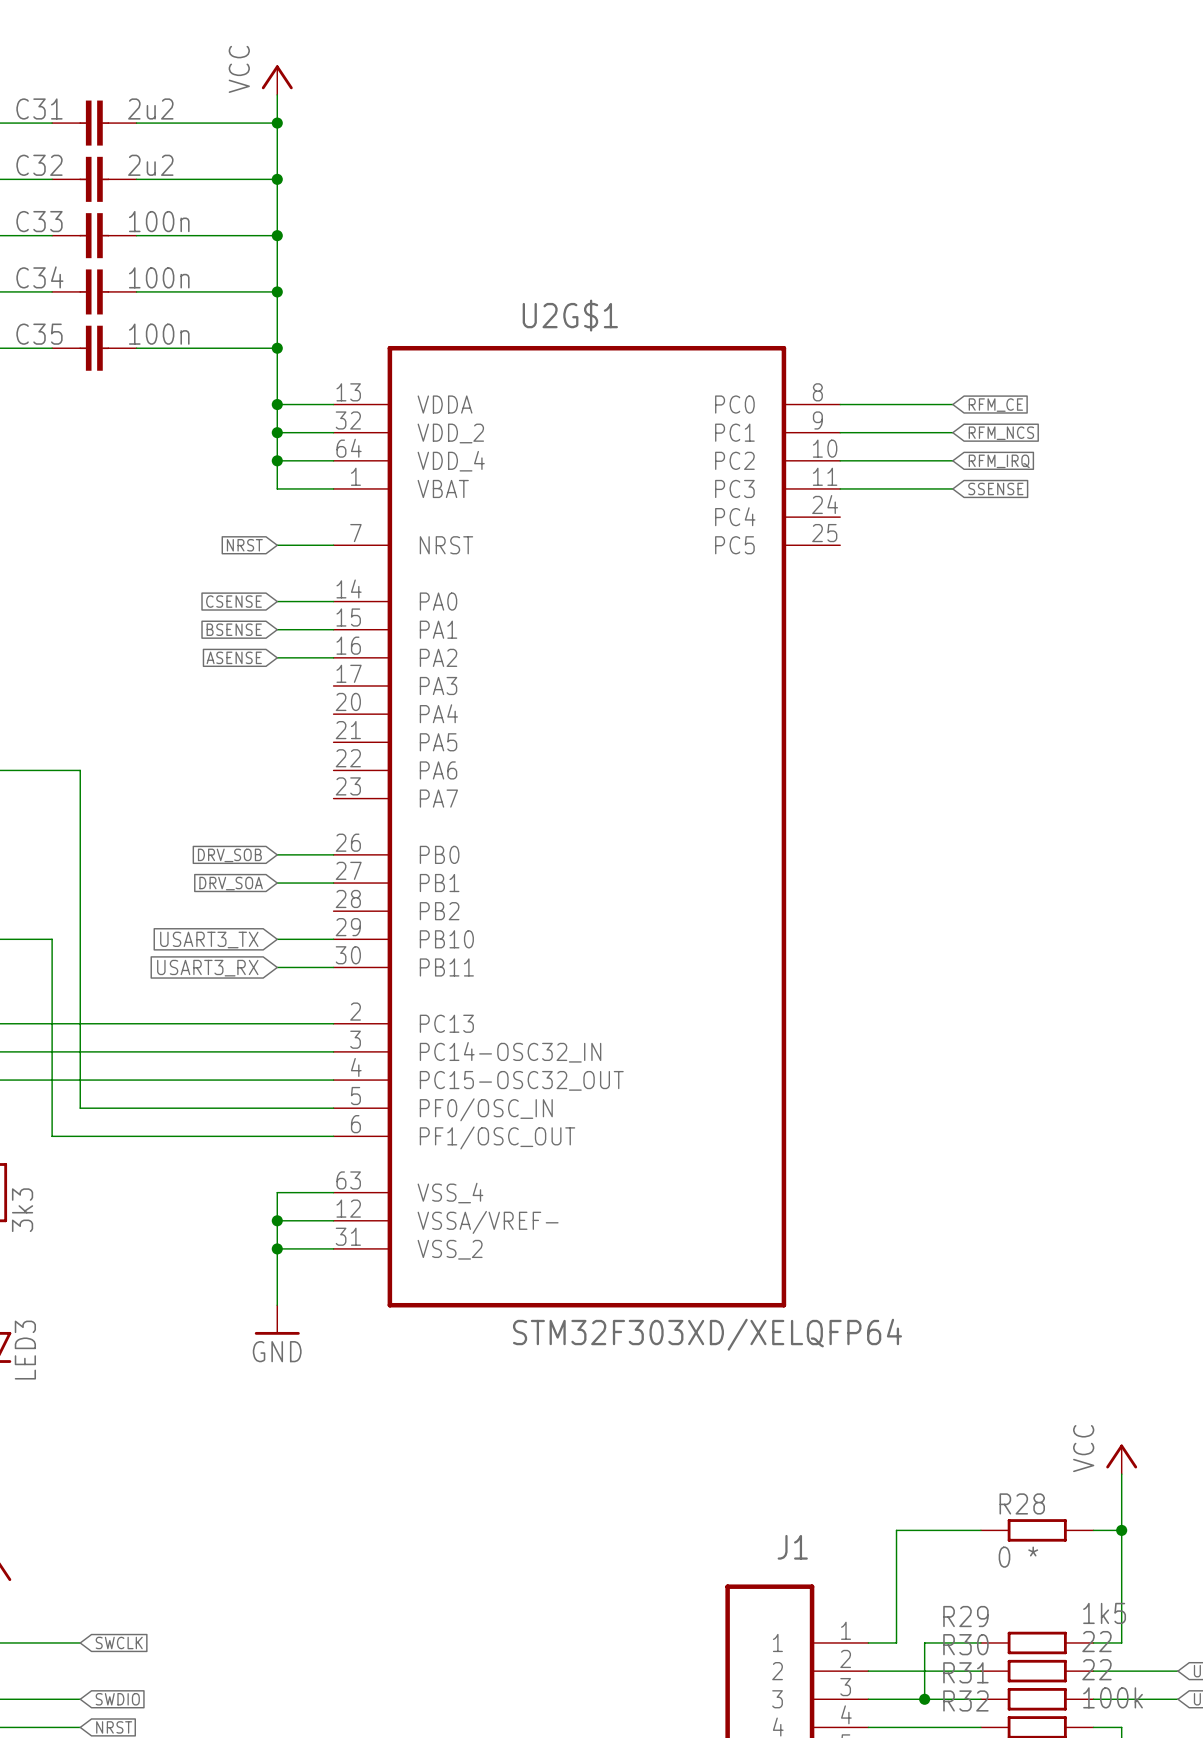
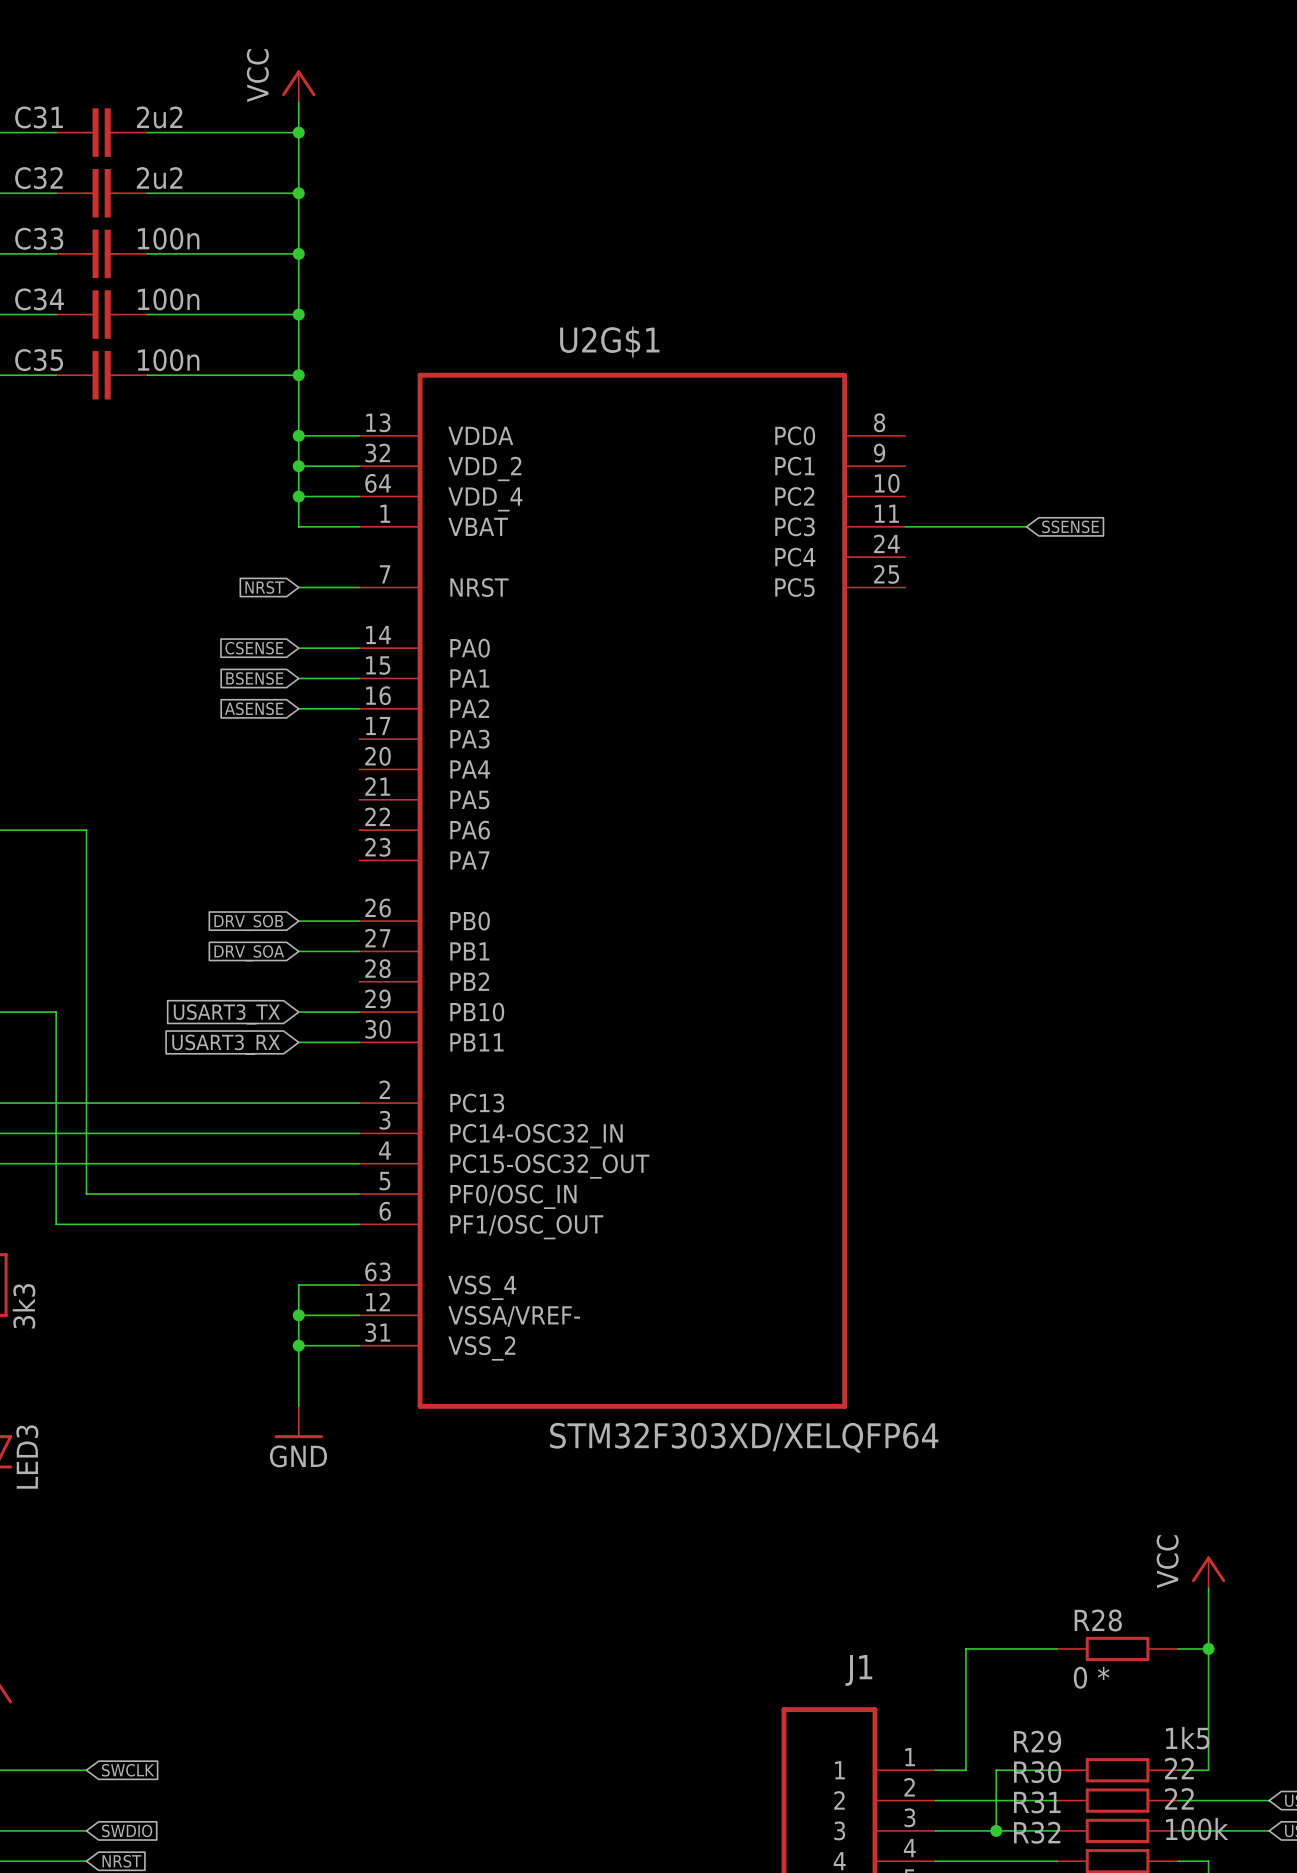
wire: (840, 404) (952, 404) -> none
global label: RFM_CE (995, 405) -> none
wire: (840, 432) (952, 432) -> none
global label: RFM_NCS (1001, 433) -> none
wire: (840, 460) (952, 460) -> none
global label: RFM_IRQ (999, 461) -> none

